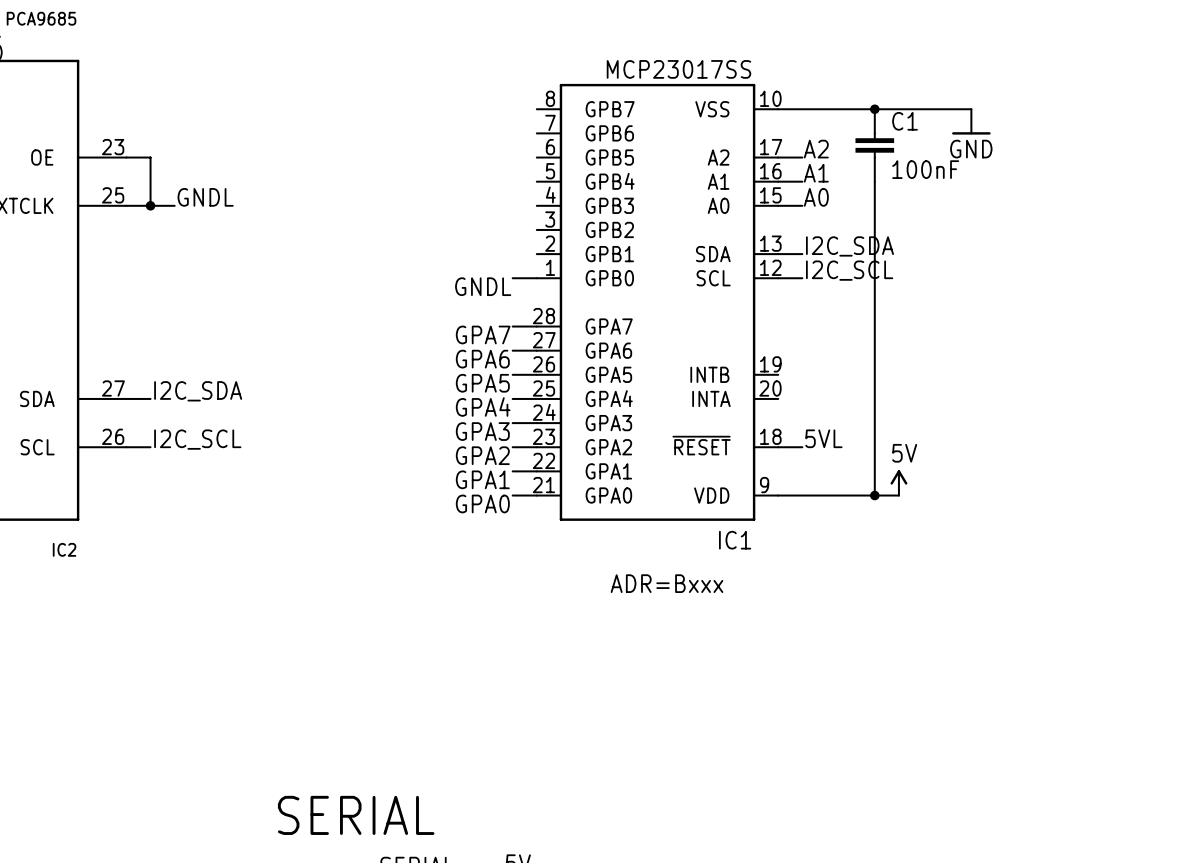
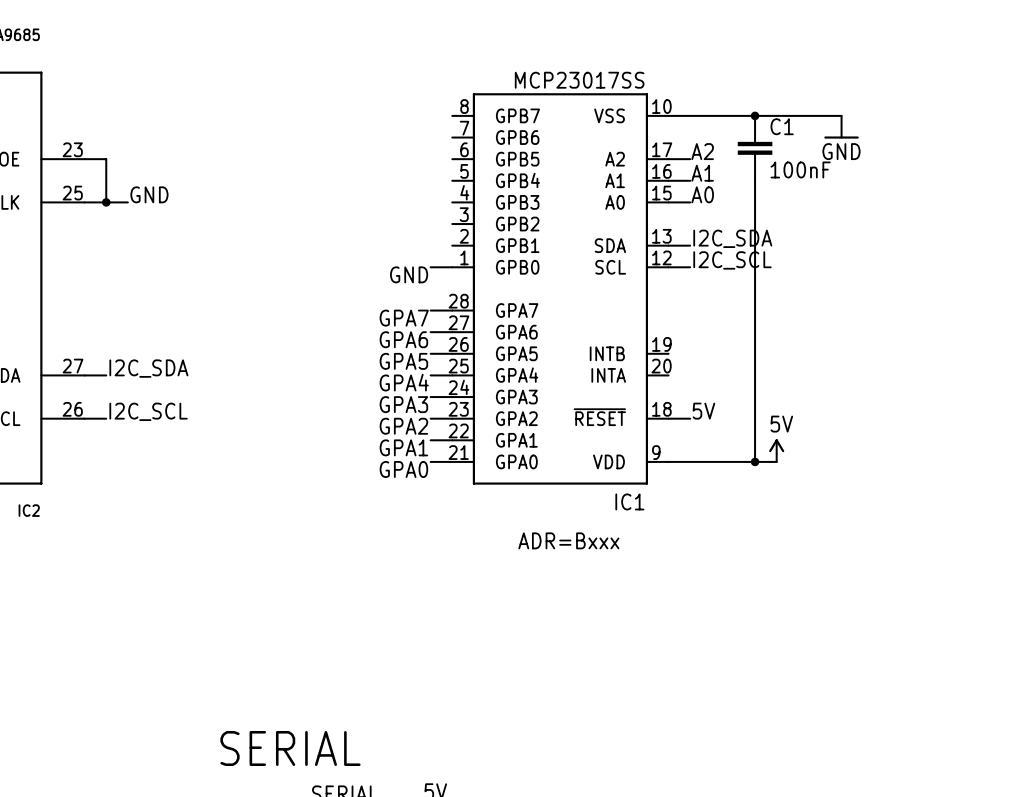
label: GNDL (205, 197) -> GND (149, 194)
label: GNDL (483, 286) -> GND (409, 274)
label: 5VL (823, 438) -> 5V (703, 411)

